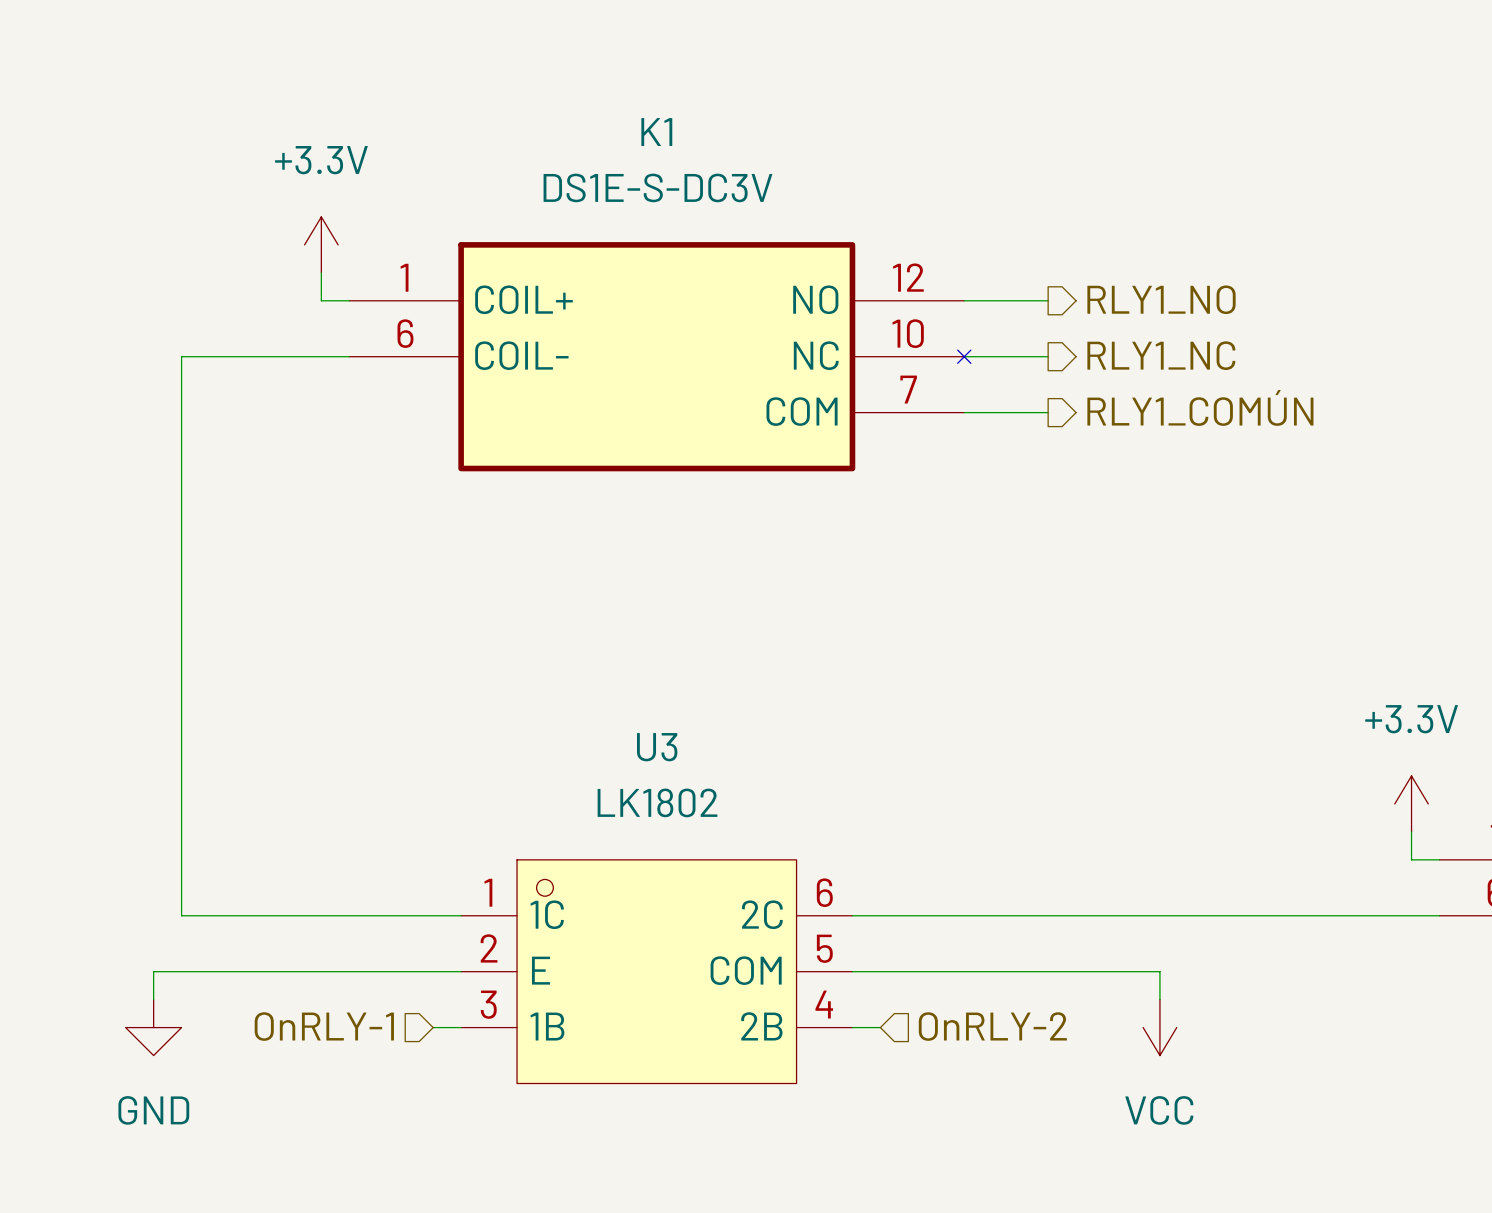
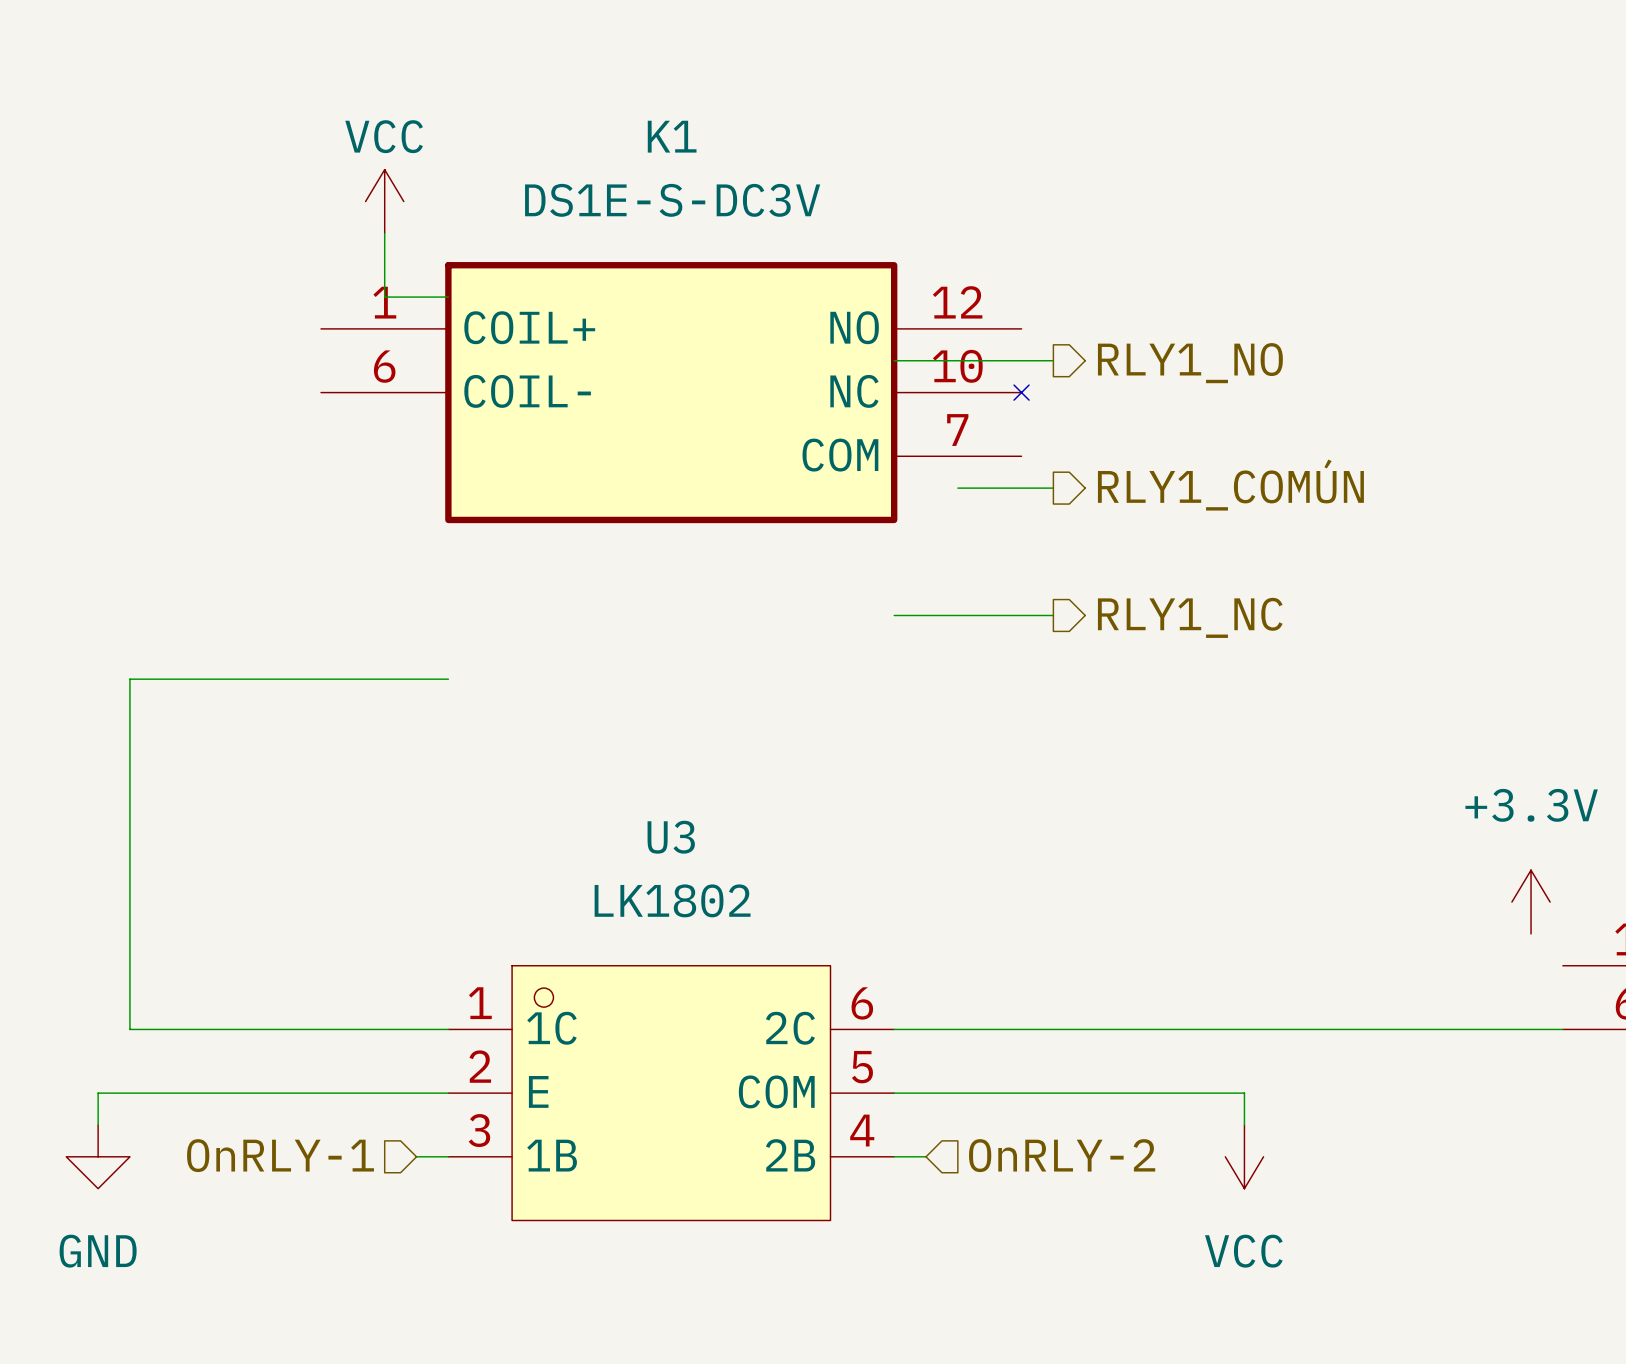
power symbol: none -> VCC (384, 201)
wire: none -> (384, 233) (384, 297) (448, 297)
power symbol: +3.3V (321, 244) -> none
wire: (321, 272) (321, 300) (349, 300) -> none
hierarchical label position: RLY1_NO (1161, 299) -> RLY1_NO (1190, 363)
wire: (964, 300) (1048, 300) -> none
wire: none -> (894, 360) (1053, 360)
hierarchical label position: RLY1_NC (1161, 355) -> RLY1_NC (1190, 617)
wire: (349, 356) (181, 356) (181, 608) -> (448, 679) (129, 679)
wire: (964, 356) (1048, 356) -> none
hierarchical label position: RLY1_COMÚN (1200, 407) -> RLY1_COMÚN (1230, 485)
wire: (964, 412) (1048, 412) -> (957, 488) (1053, 488)
wire: none -> (894, 615) (1053, 615)
wire: (1411, 831) (1411, 859) (1439, 859) -> none

